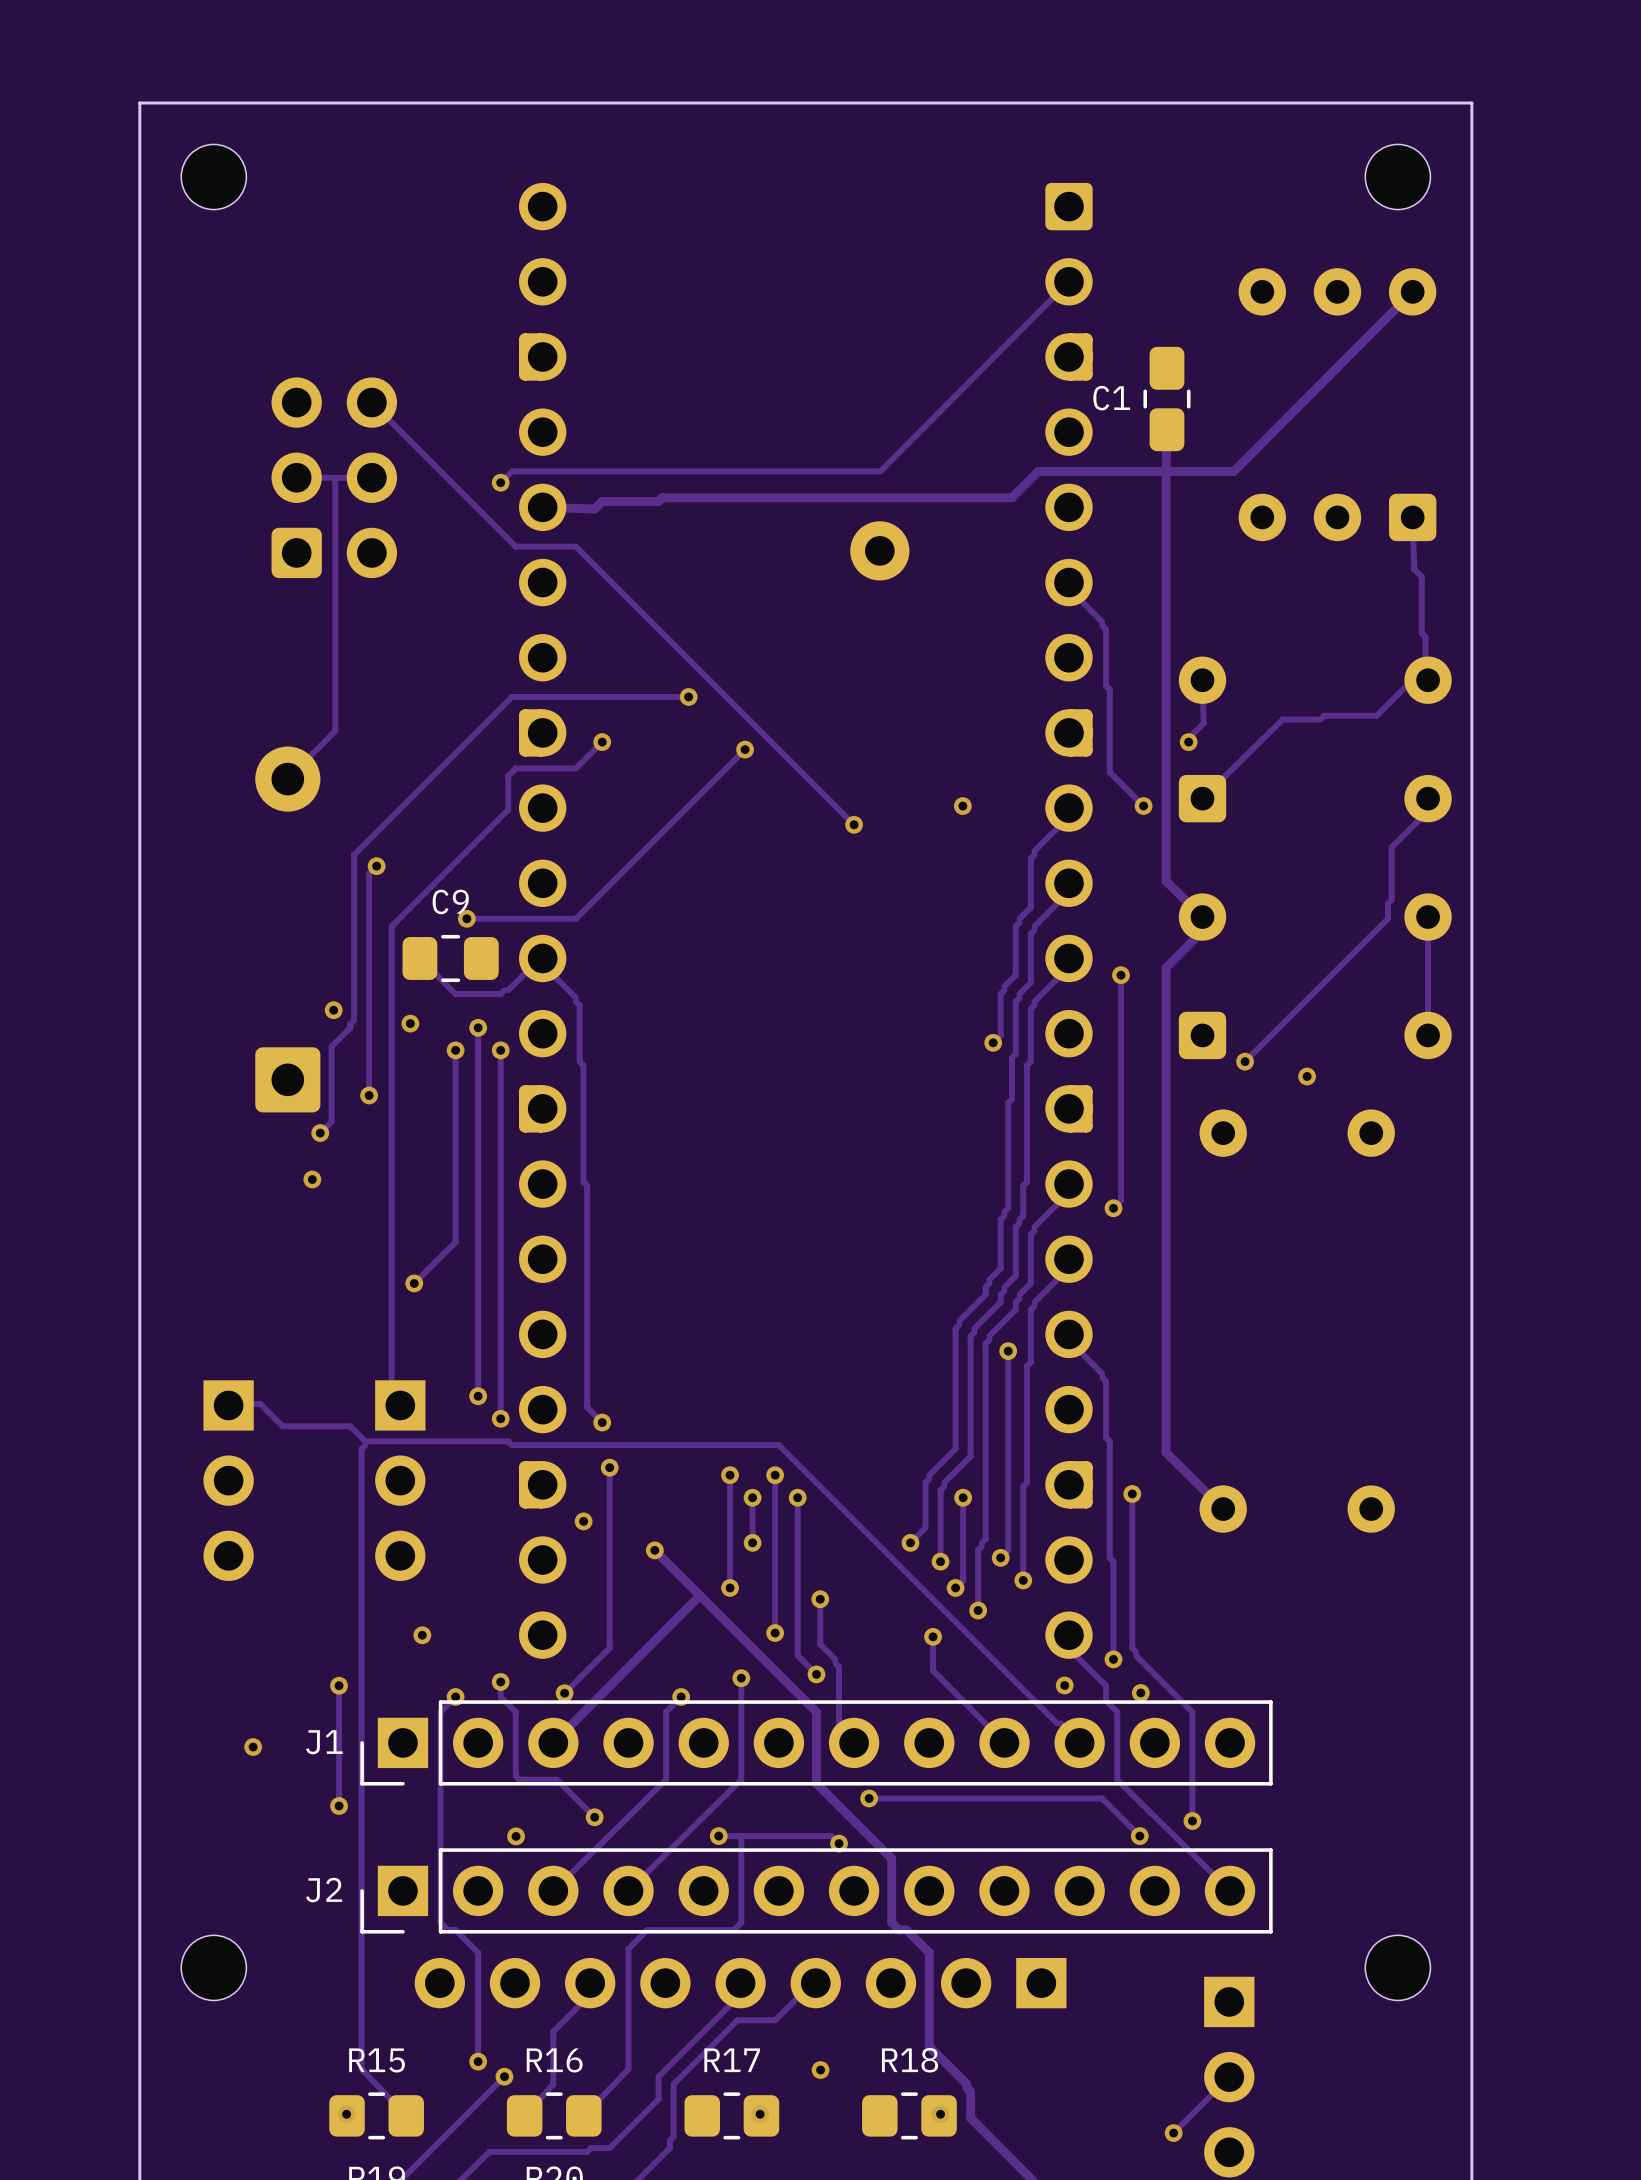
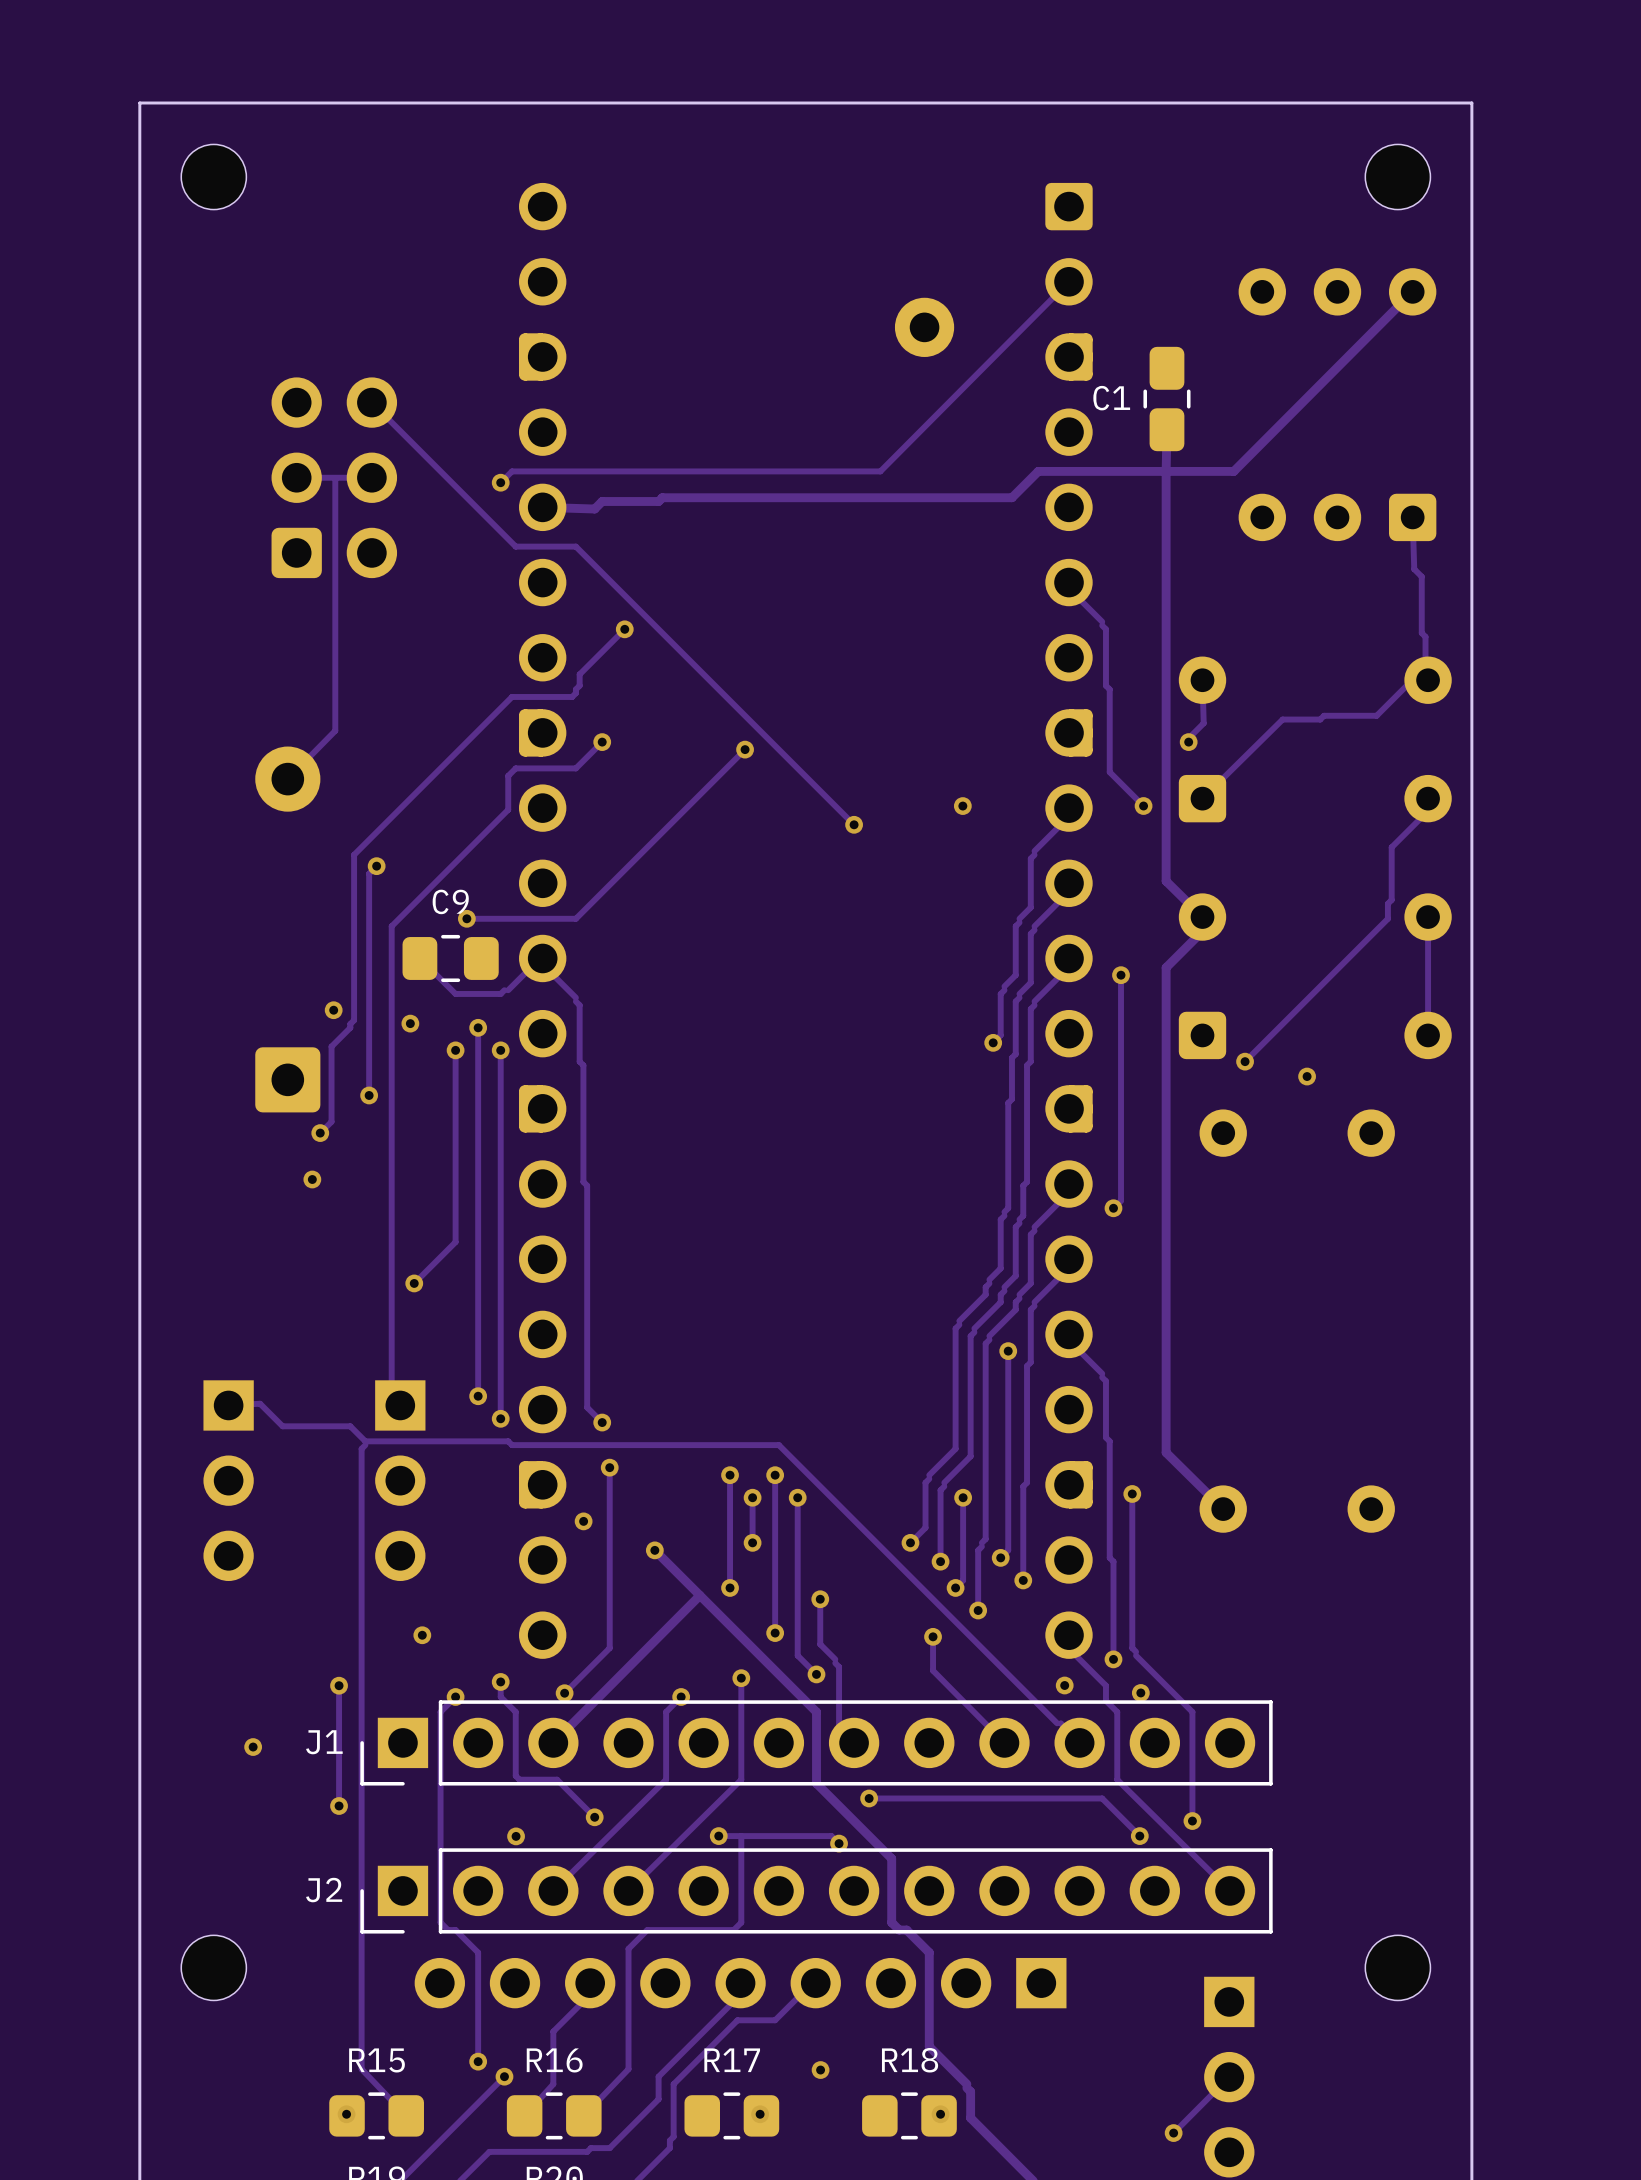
part position: (879, 550) -> (924, 327)
track: (572, 696) (688, 696) -> (572, 696) (579, 685) (579, 674) (624, 629)
via position: (688, 696) -> (624, 629)

